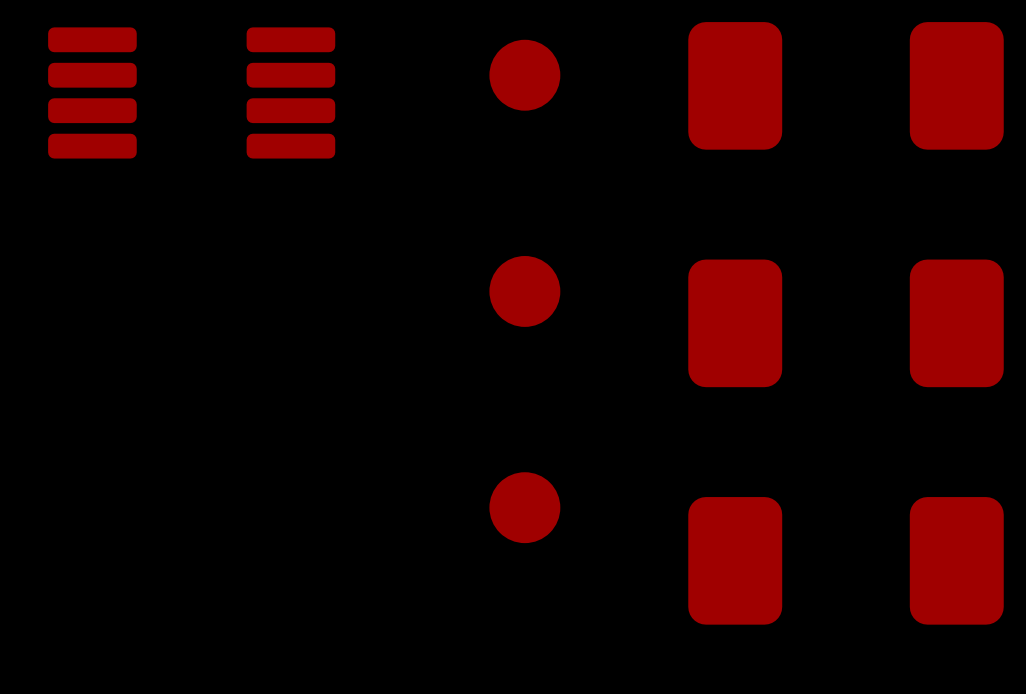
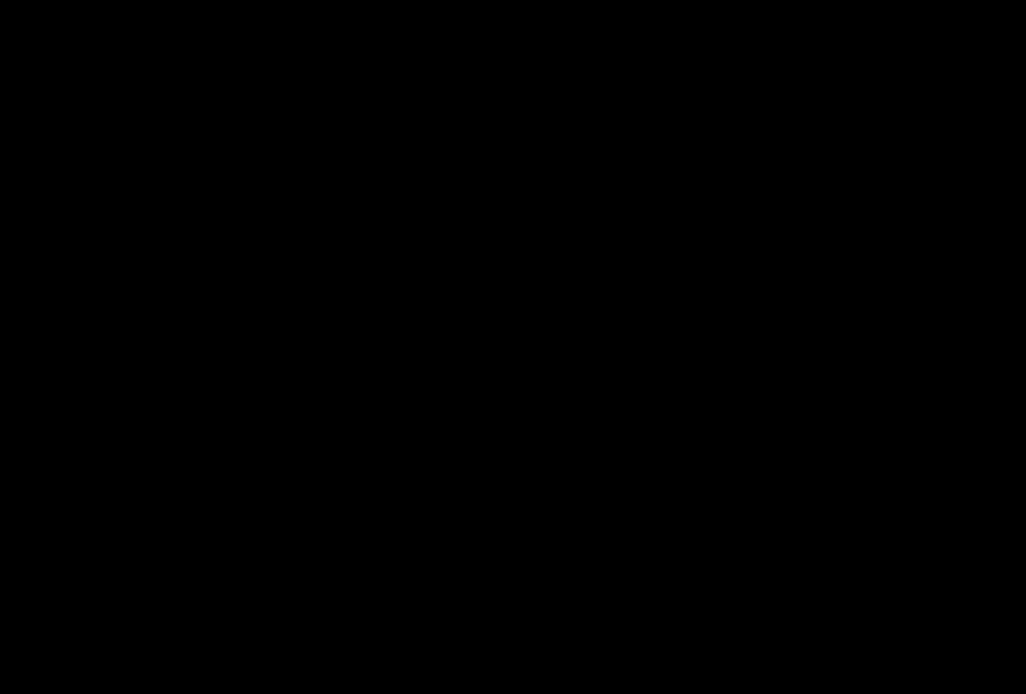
part: (524, 75) -> none
part: (846, 85) -> none
part: (191, 92) -> none
part: (524, 291) -> none
part: (846, 323) -> none
part: (524, 507) -> none
part: (846, 560) -> none

